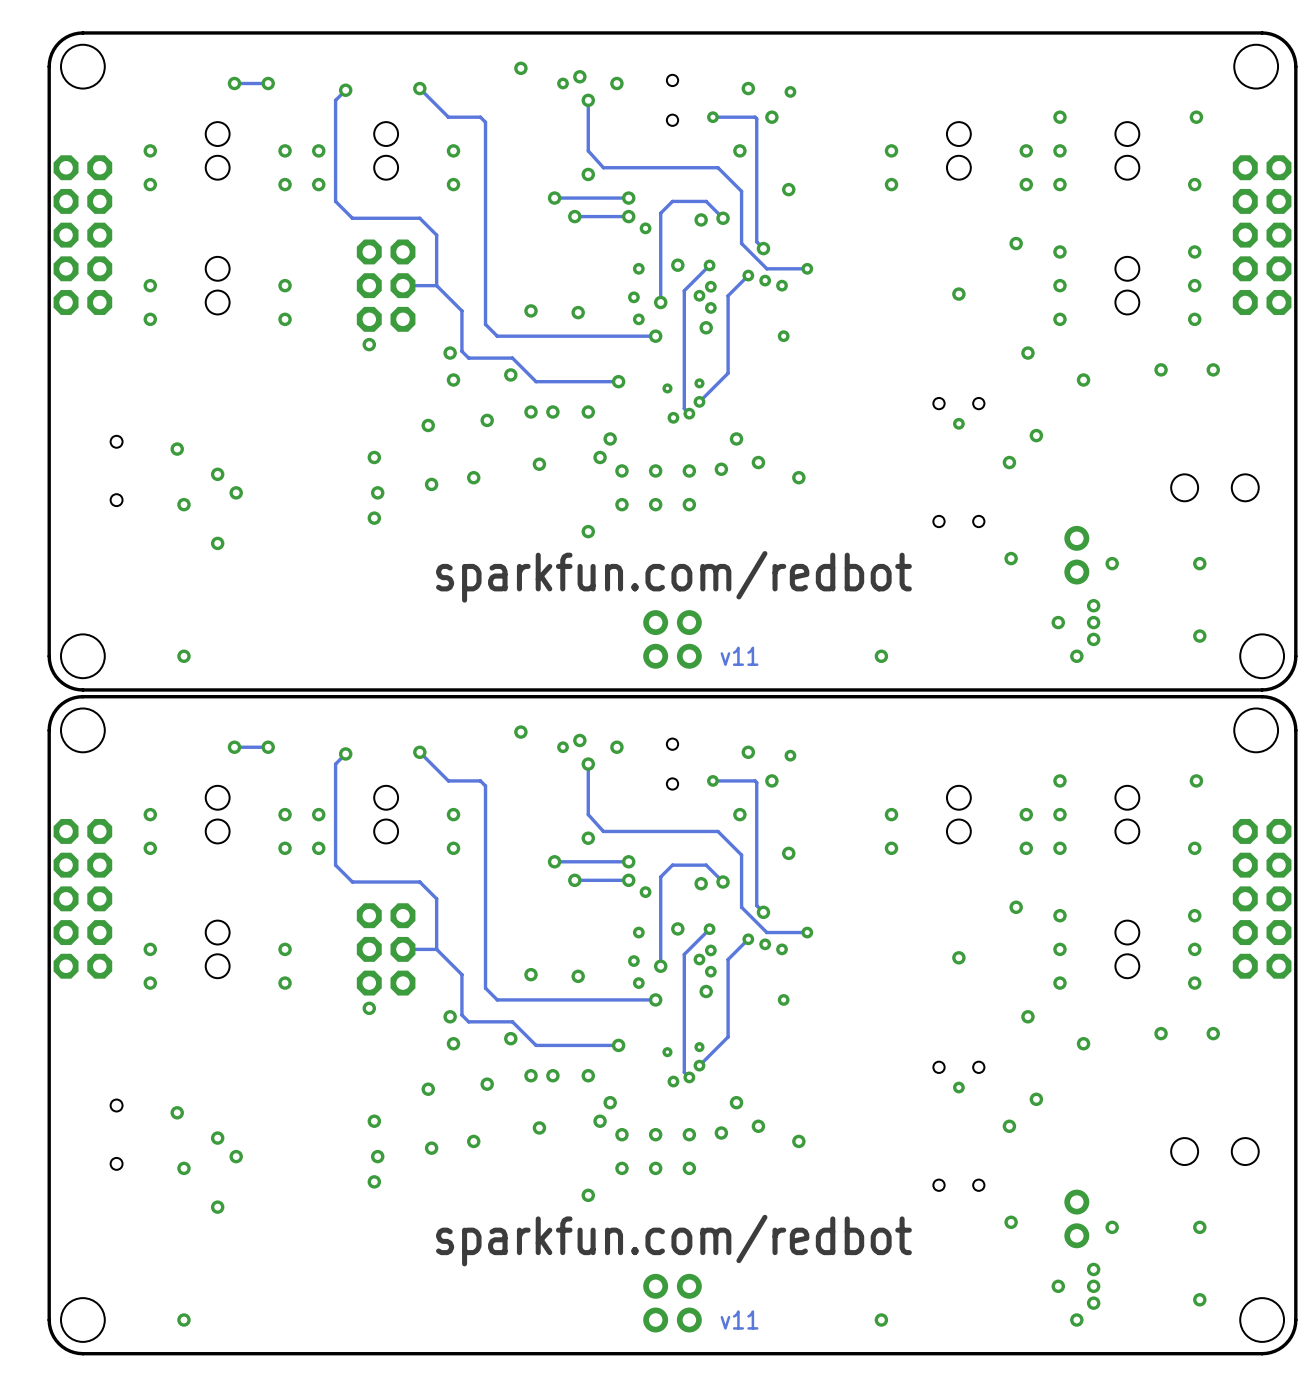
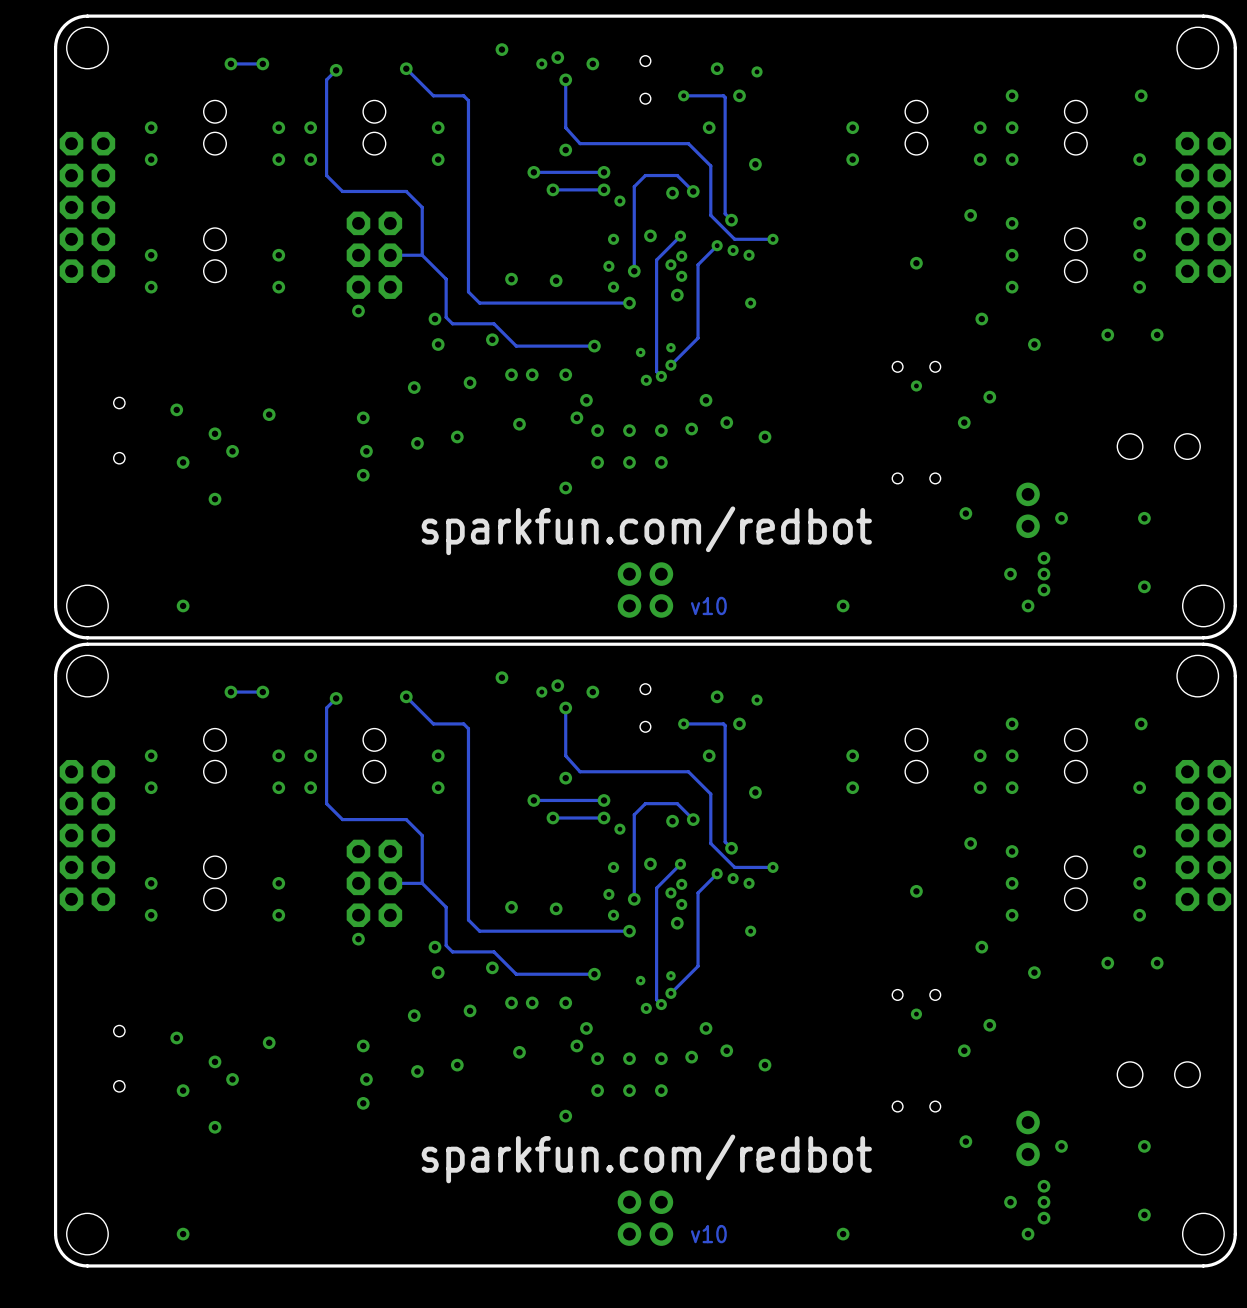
via: none -> (269, 414)
text: v11 (739, 656) -> v10 (708, 605)
via: none -> (269, 1042)
text: v11 (739, 1320) -> v10 (708, 1234)

